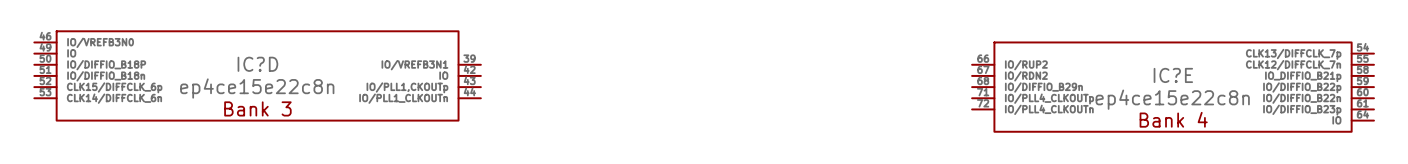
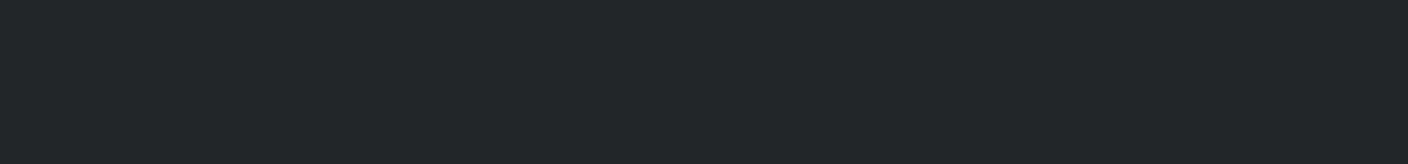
IC?D: ep4ce15e22c8n (257, 75) -> none
IC?E: ep4ce15e22c8n (1173, 87) -> none

